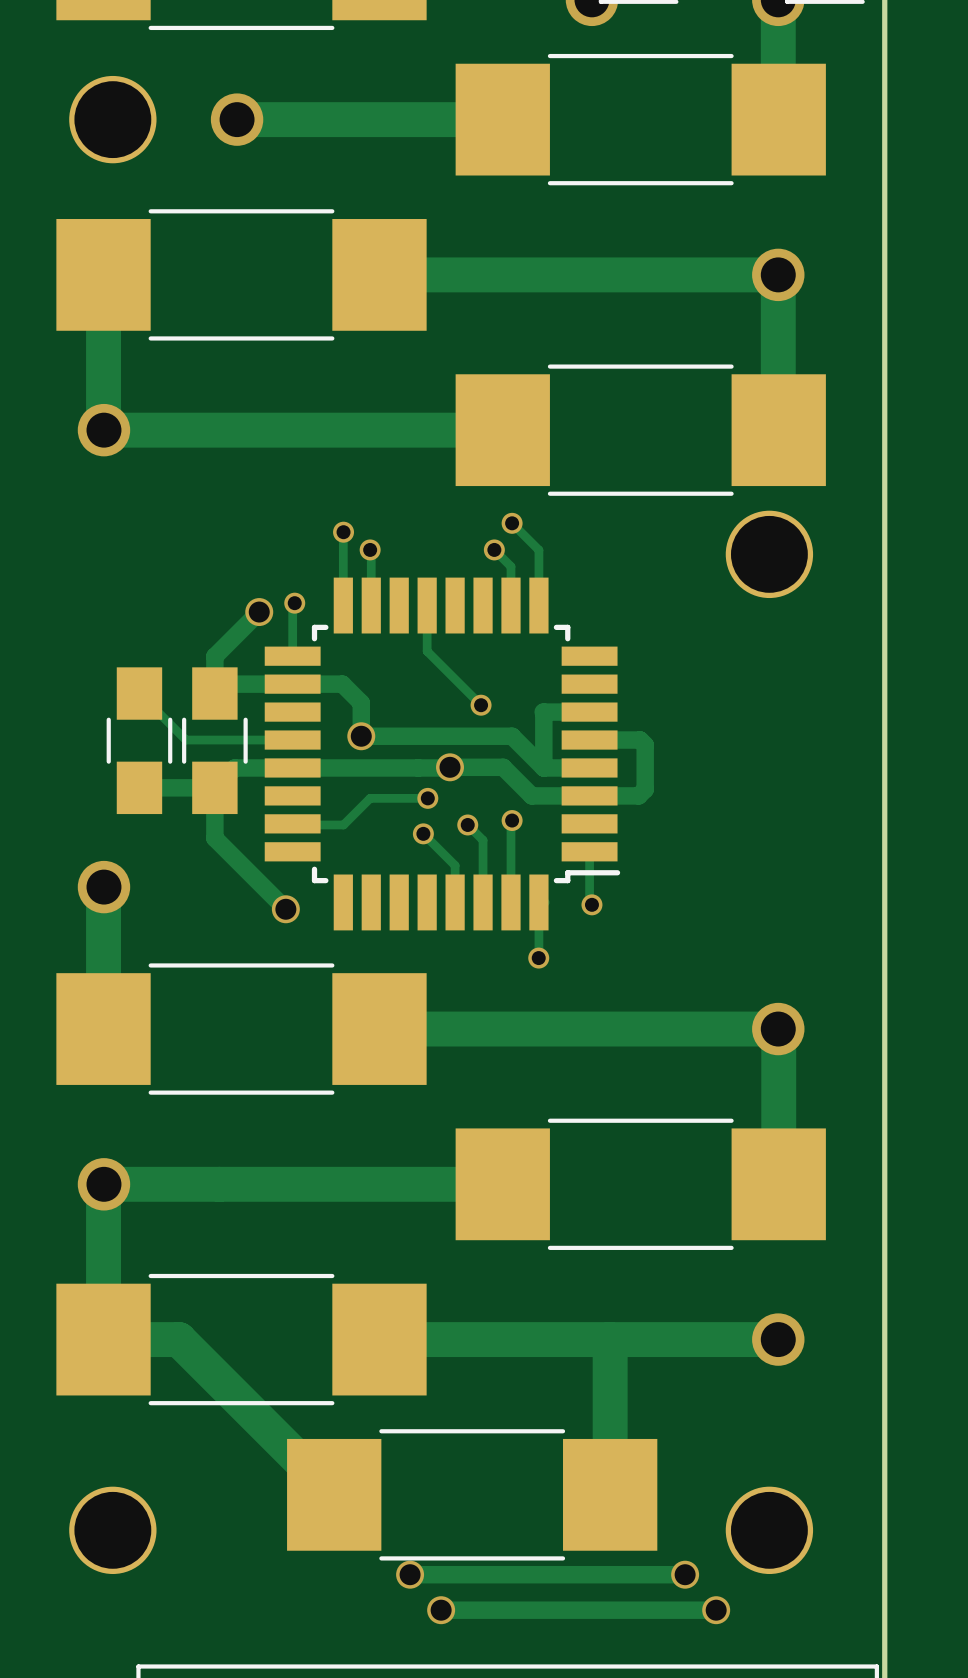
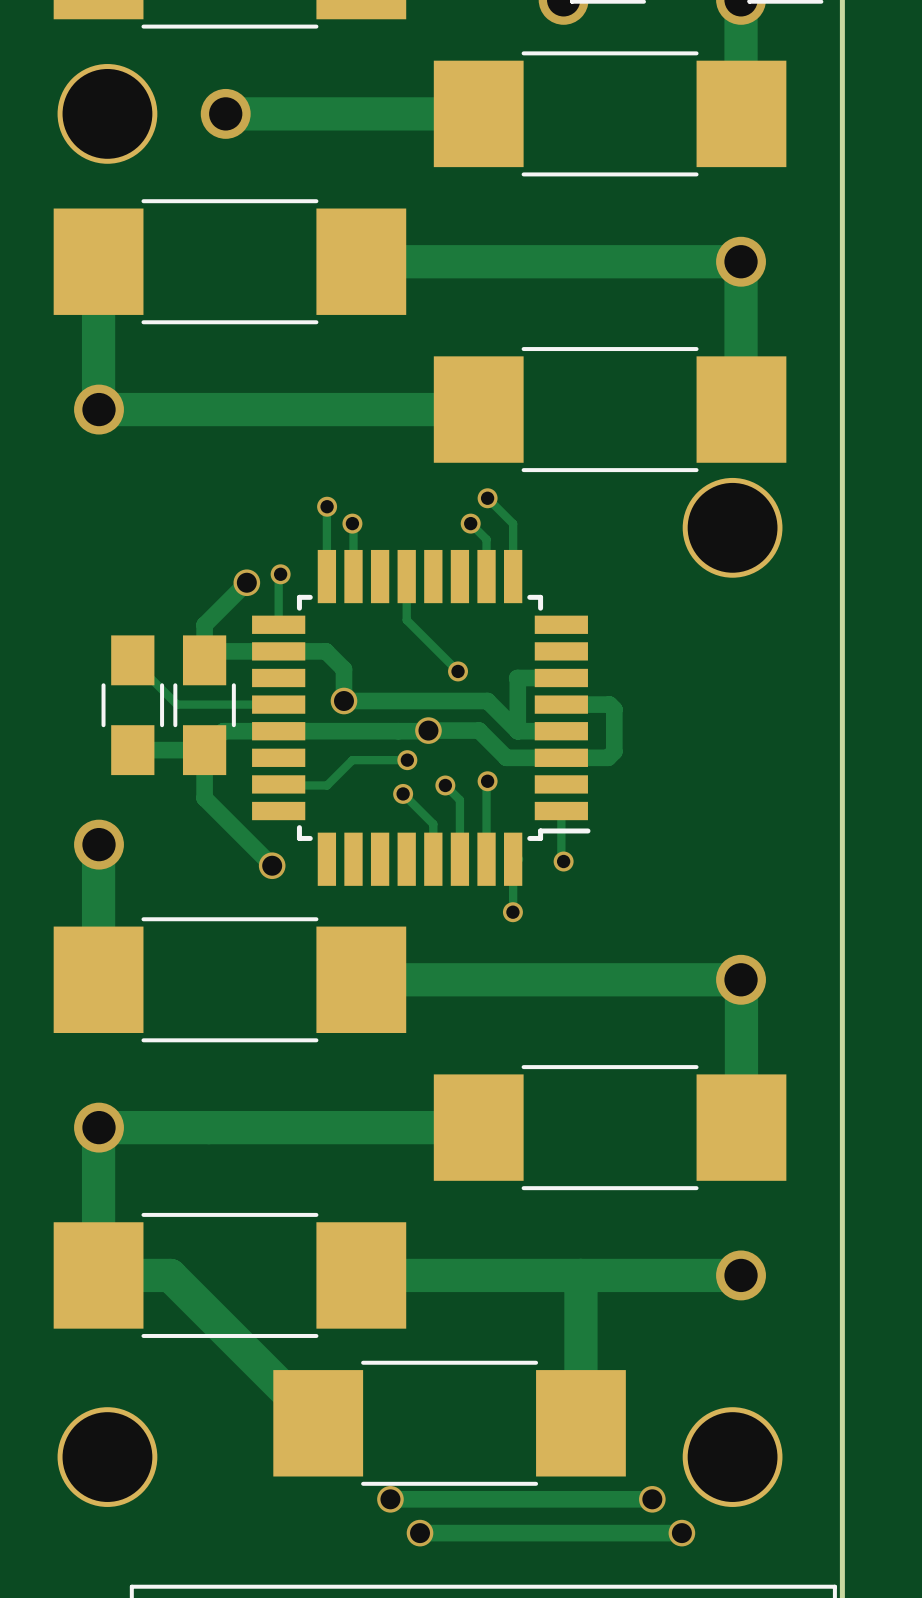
part footprint: [69, 75, 157, 164] -> [57, 64, 158, 164]
part footprint: [725, 510, 814, 599] -> [682, 477, 783, 578]
part footprint: [69, 1486, 157, 1575] -> [57, 1407, 158, 1507]
part footprint: [725, 1486, 814, 1575] -> [682, 1407, 783, 1507]

